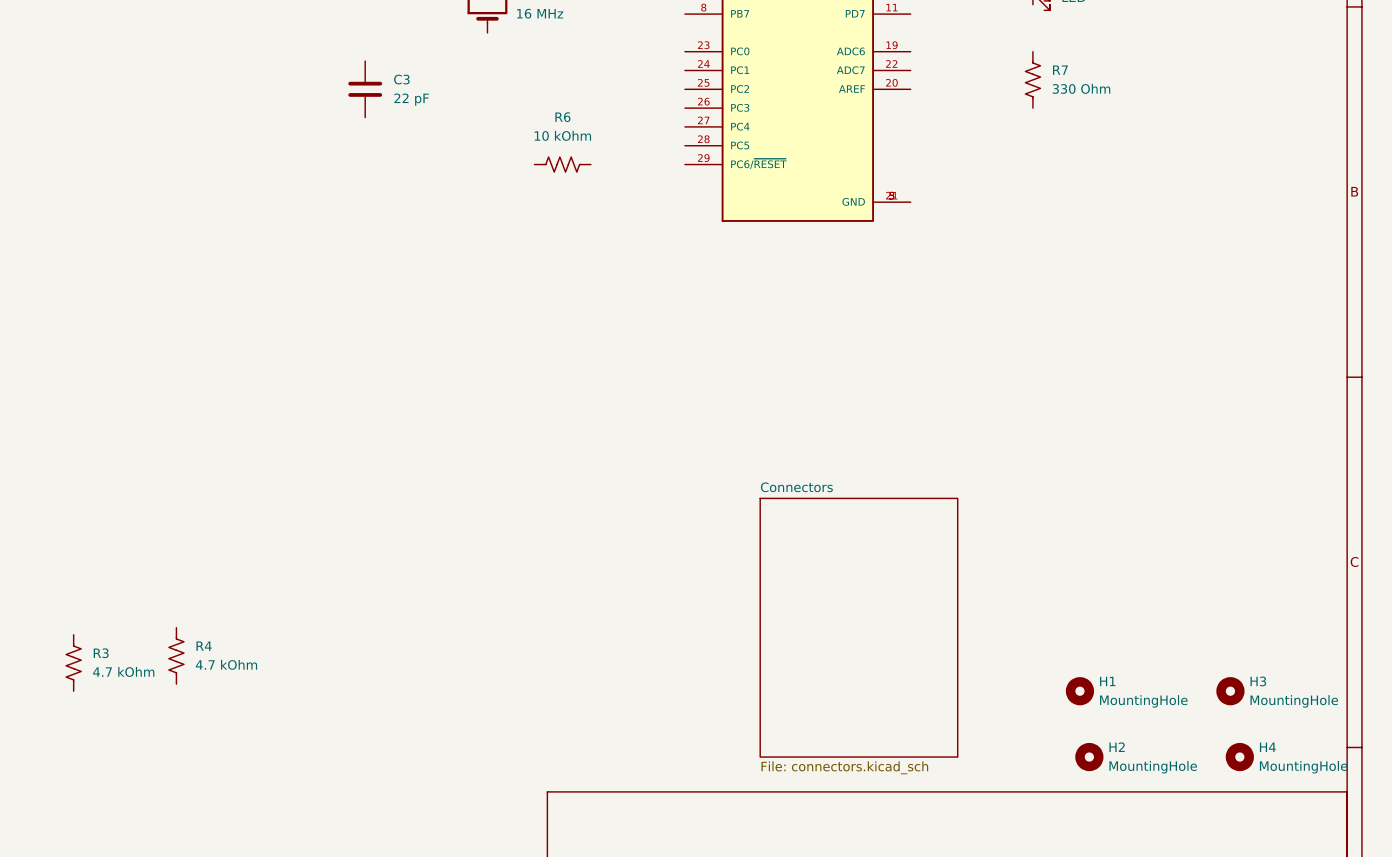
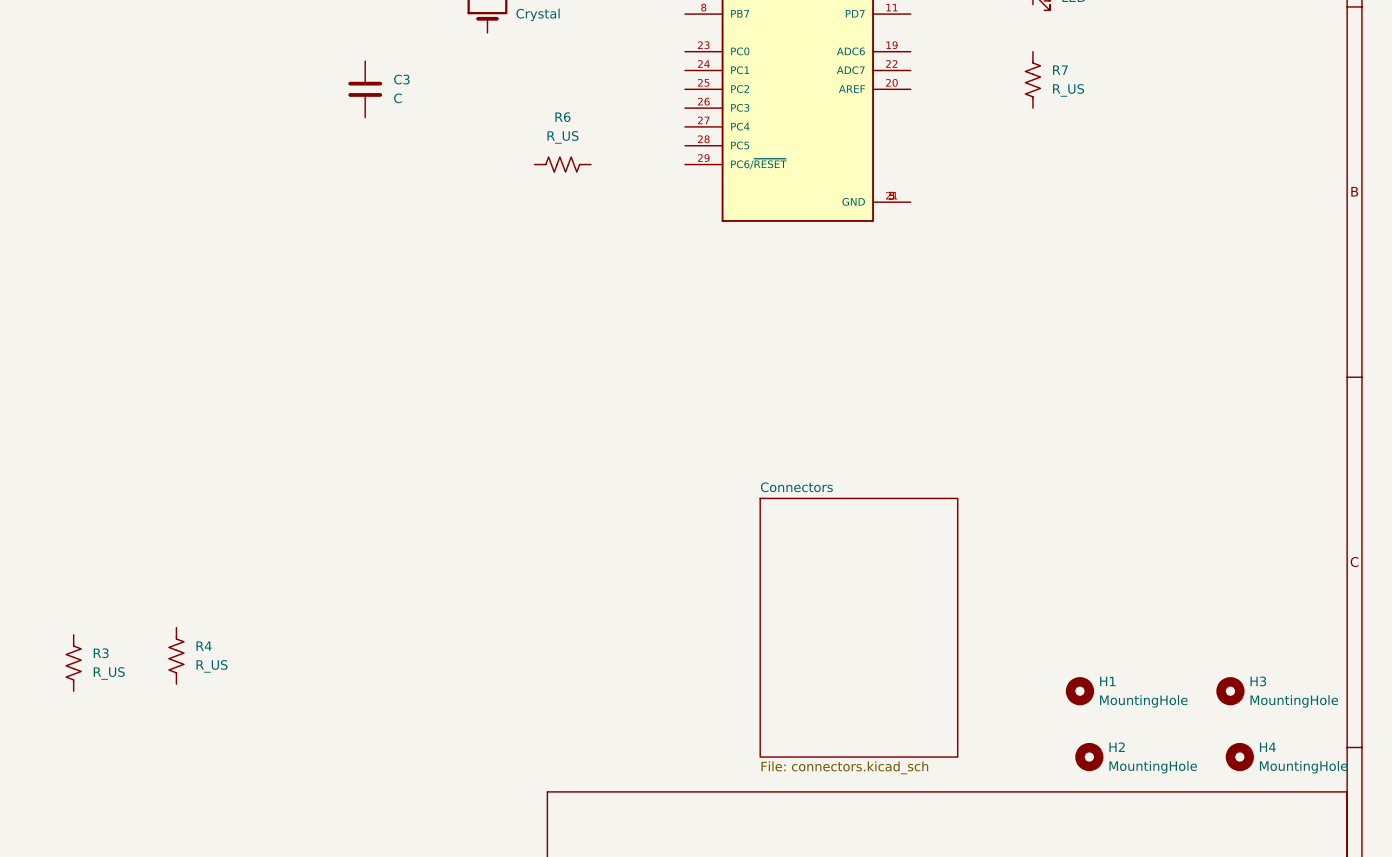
part value: 16 MHz (540, 13) -> Crystal (538, 14)
R7 value: 330 Ohm (1081, 88) -> R_US (1068, 90)
C3 value: 22 pF (411, 99) -> C (397, 98)
R6 value: 10 kOhm (562, 135) -> R_US (562, 137)
R4 value: 4.7 kOhm (226, 664) -> R_US (212, 666)
R3 value: 4.7 kOhm (123, 671) -> R_US (109, 673)

